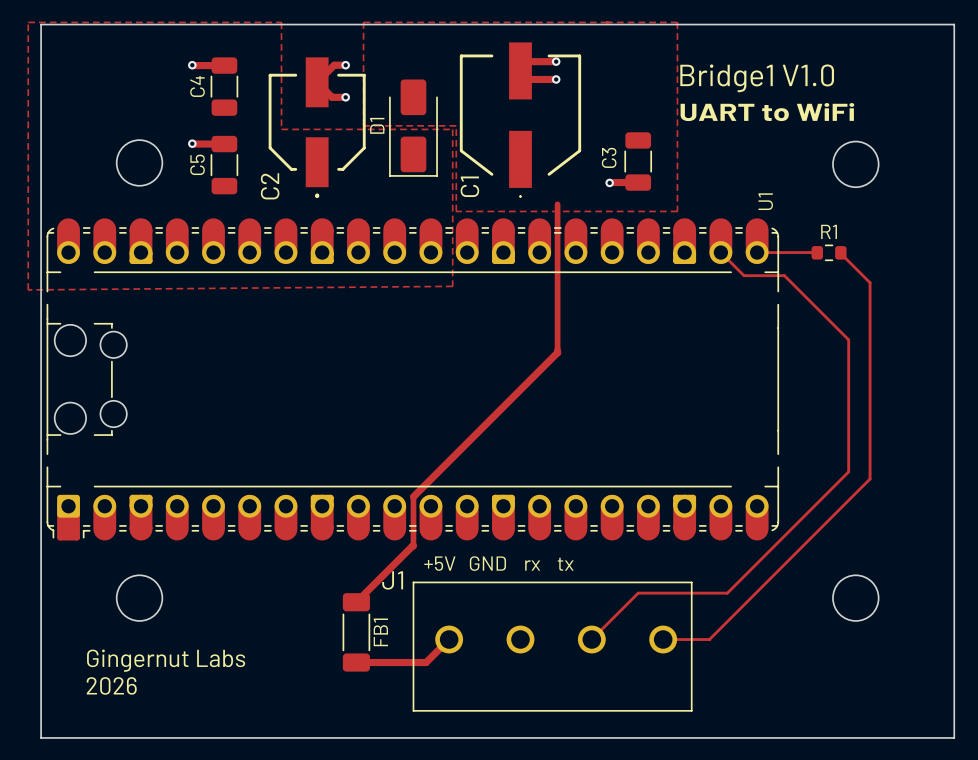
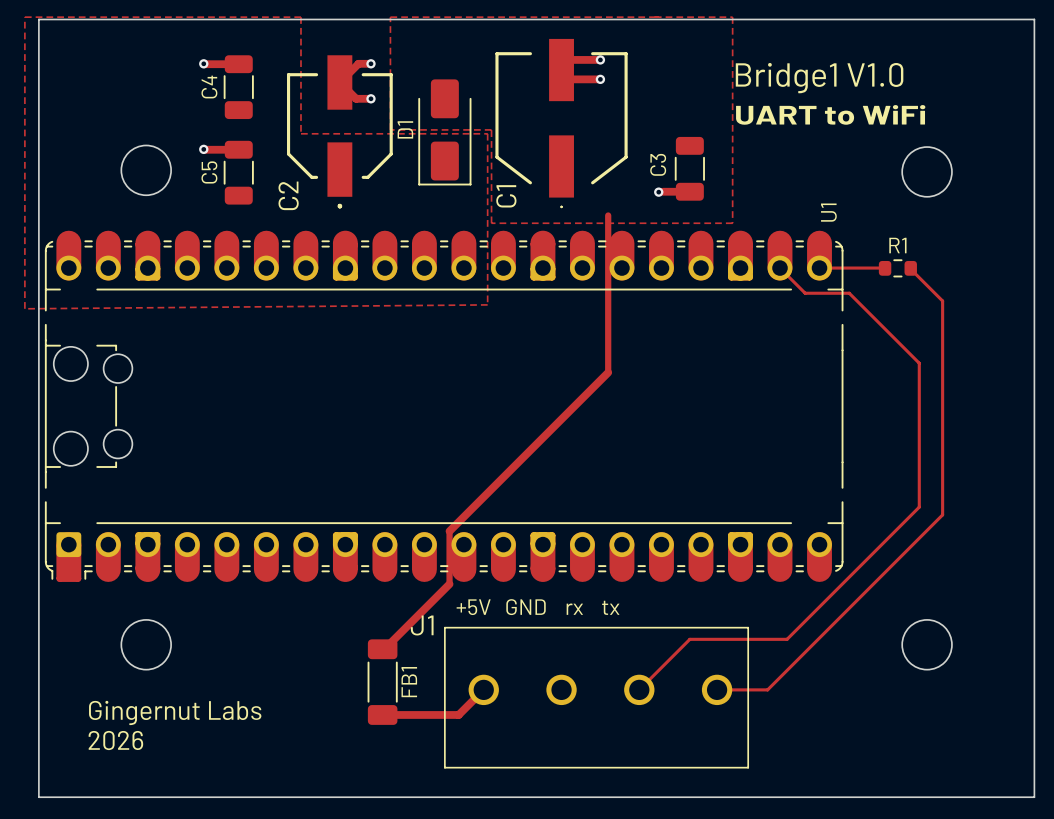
track: (557, 204) (557, 352) (413, 496) -> none
track: (413, 497) (413, 545) (356, 602) -> (608, 215) (608, 372) (449, 531) (449, 584) (382, 649)

